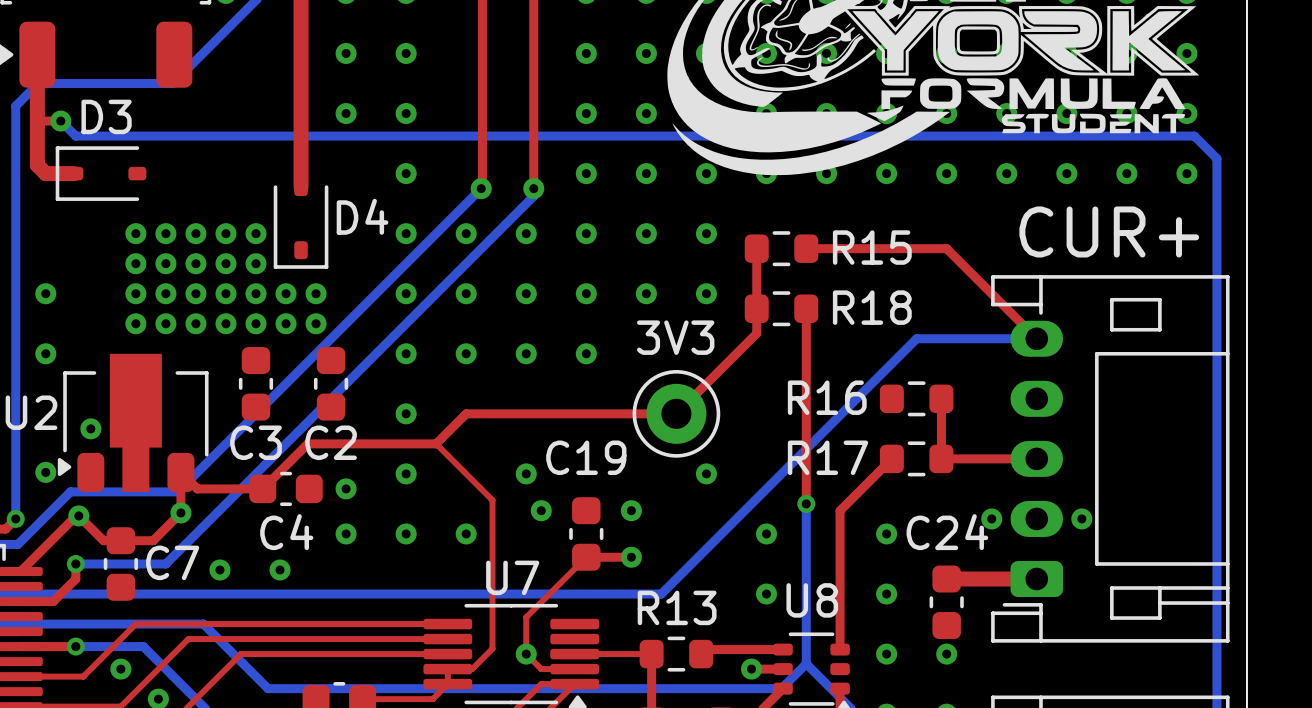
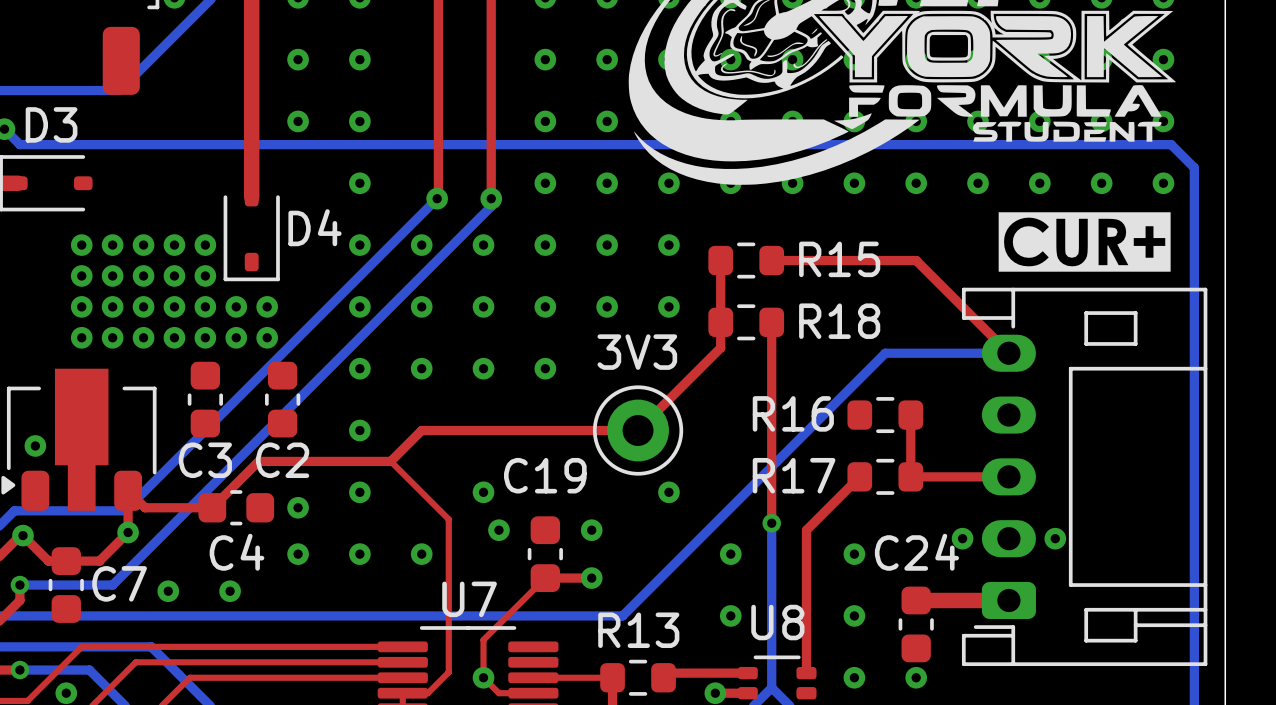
drawing: none -> [998, 212, 1171, 272]
text: CUR+ (1109, 231) -> none

